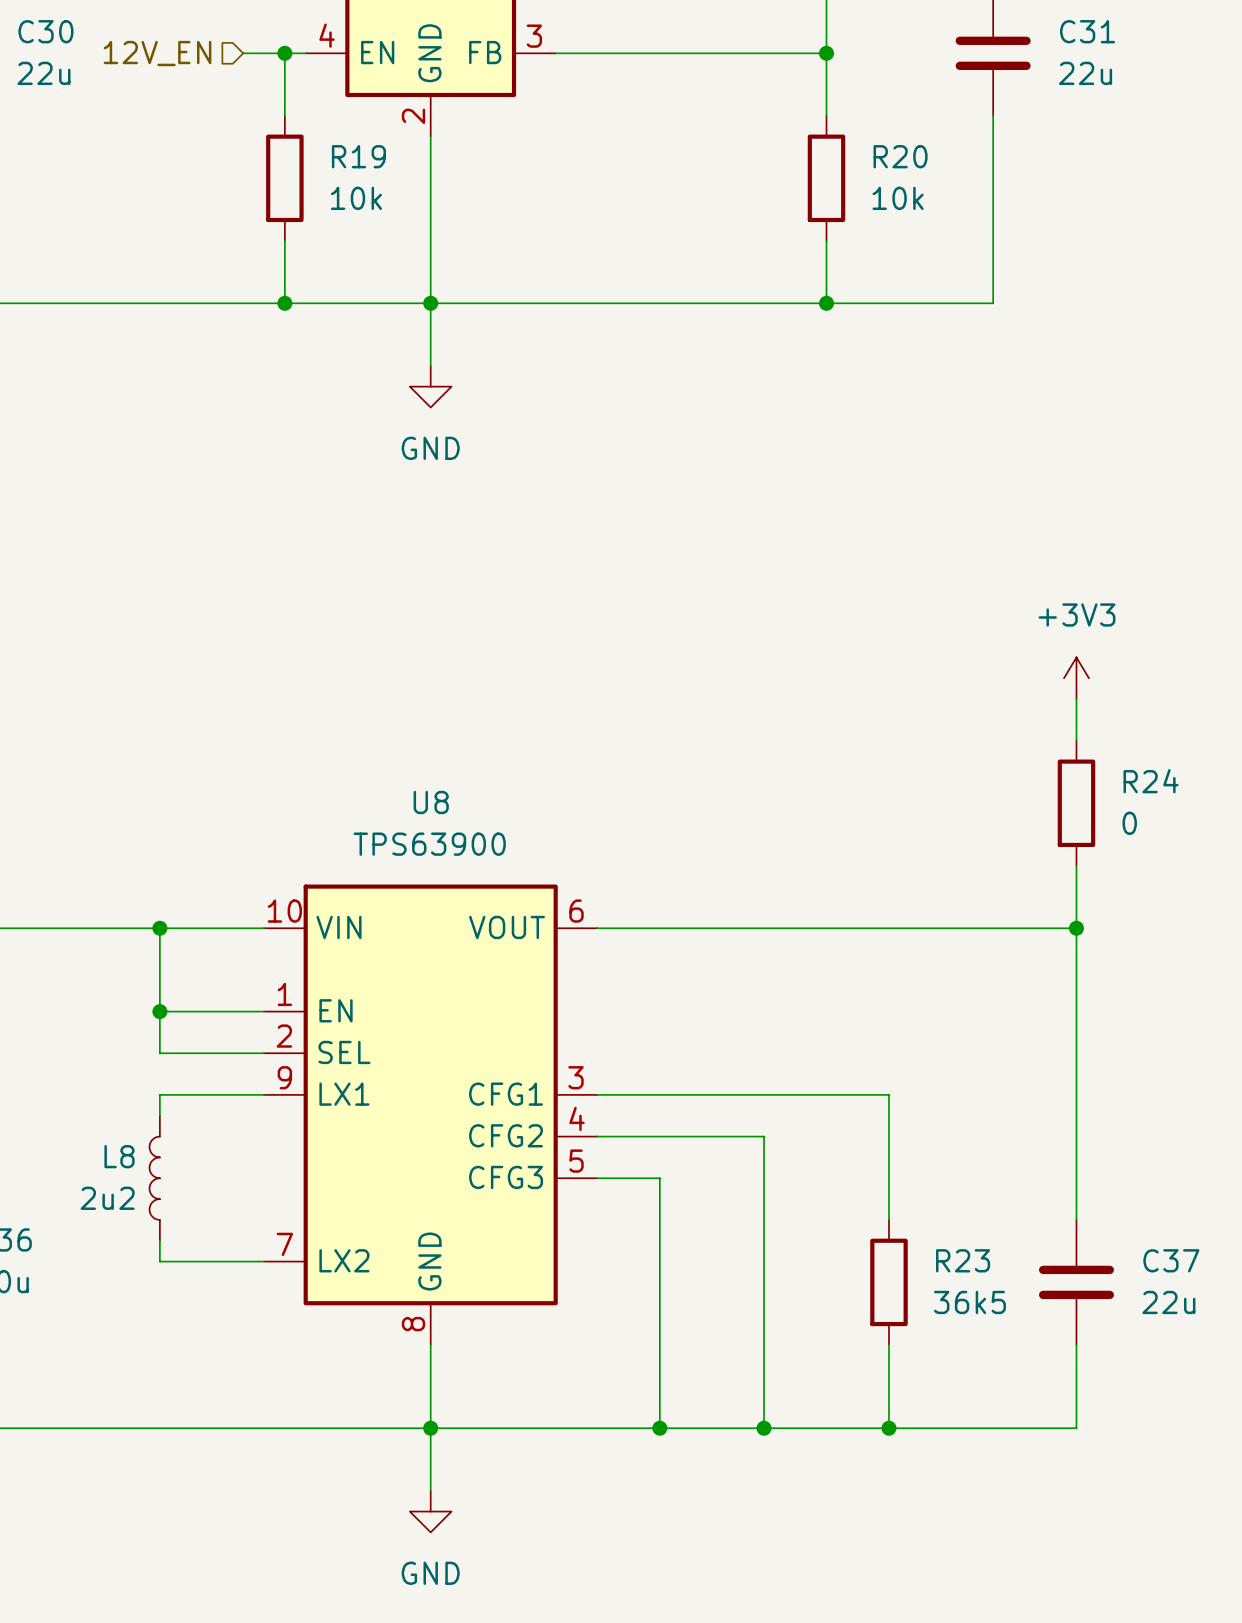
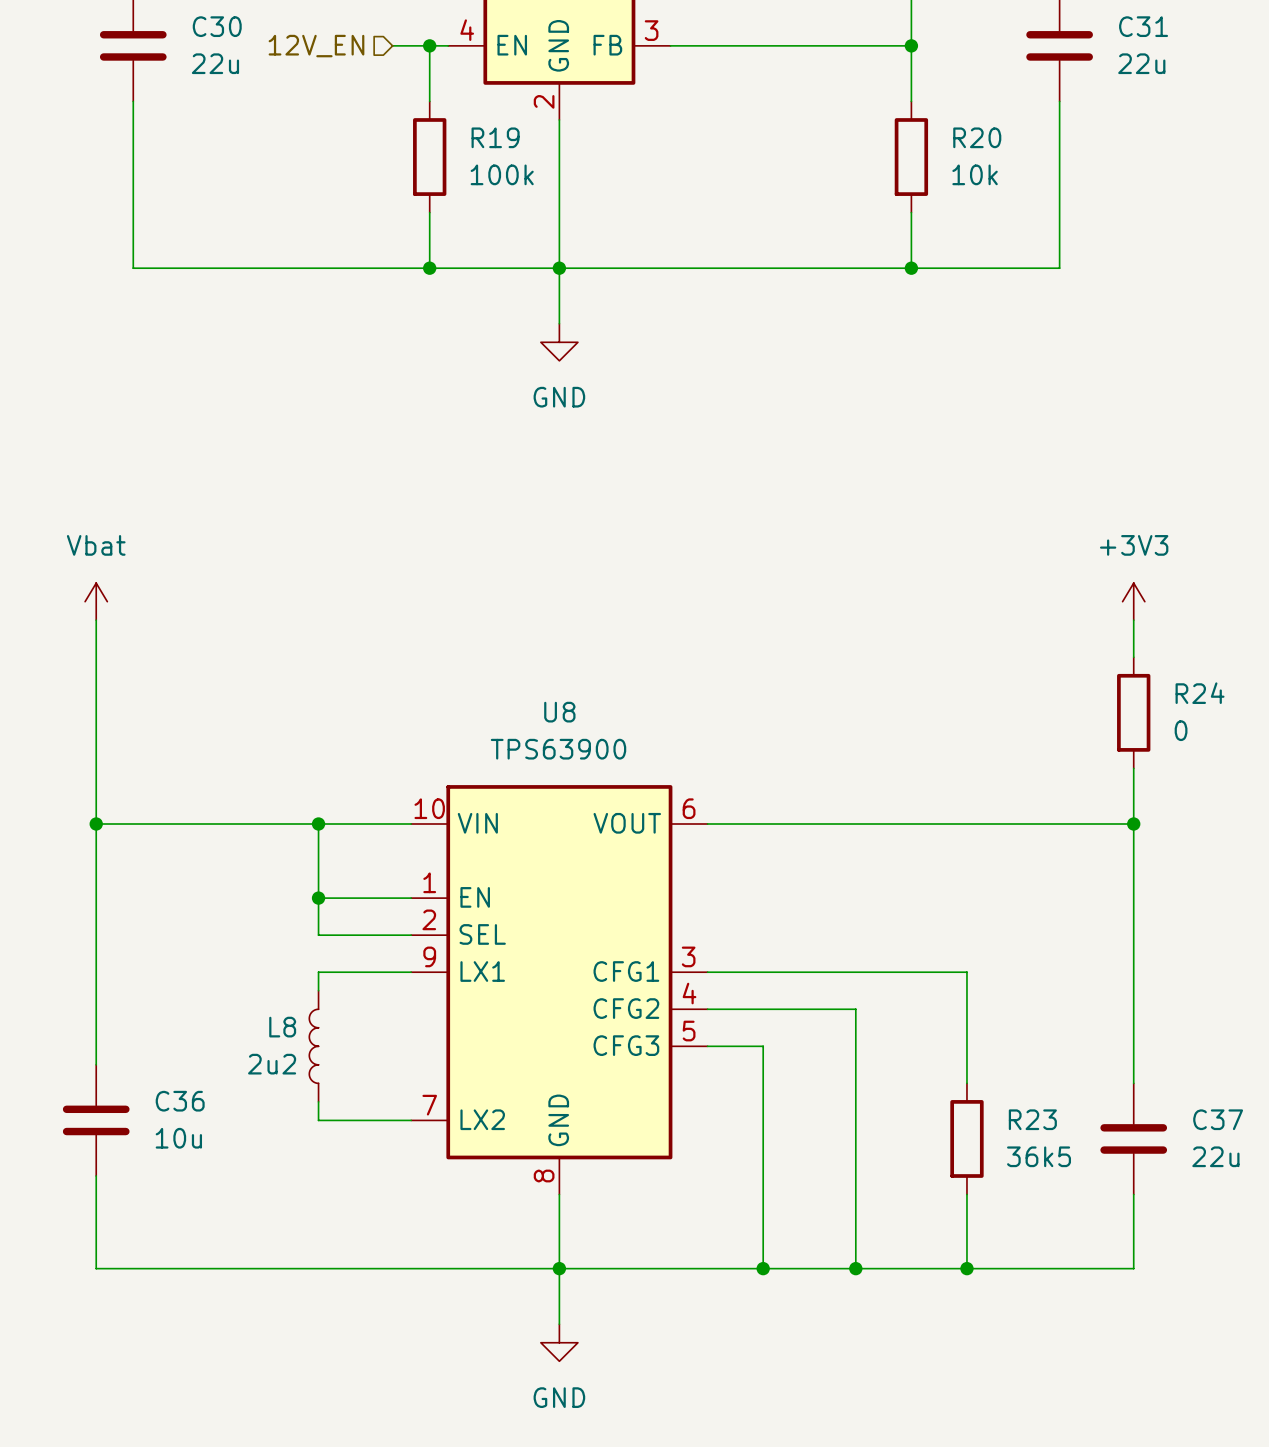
R19 value: 10k (356, 198) -> 100k (502, 174)

